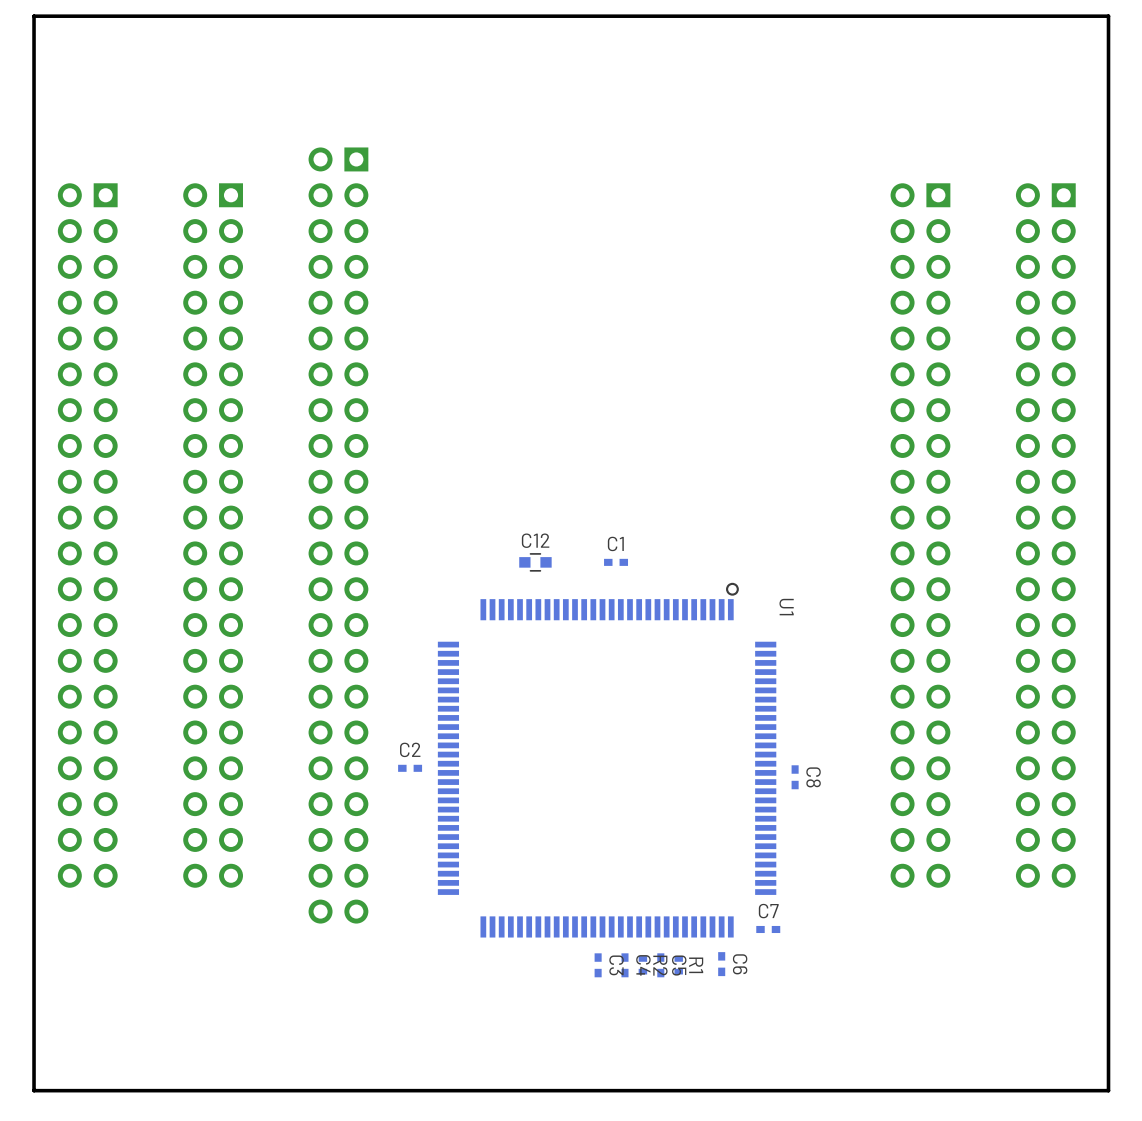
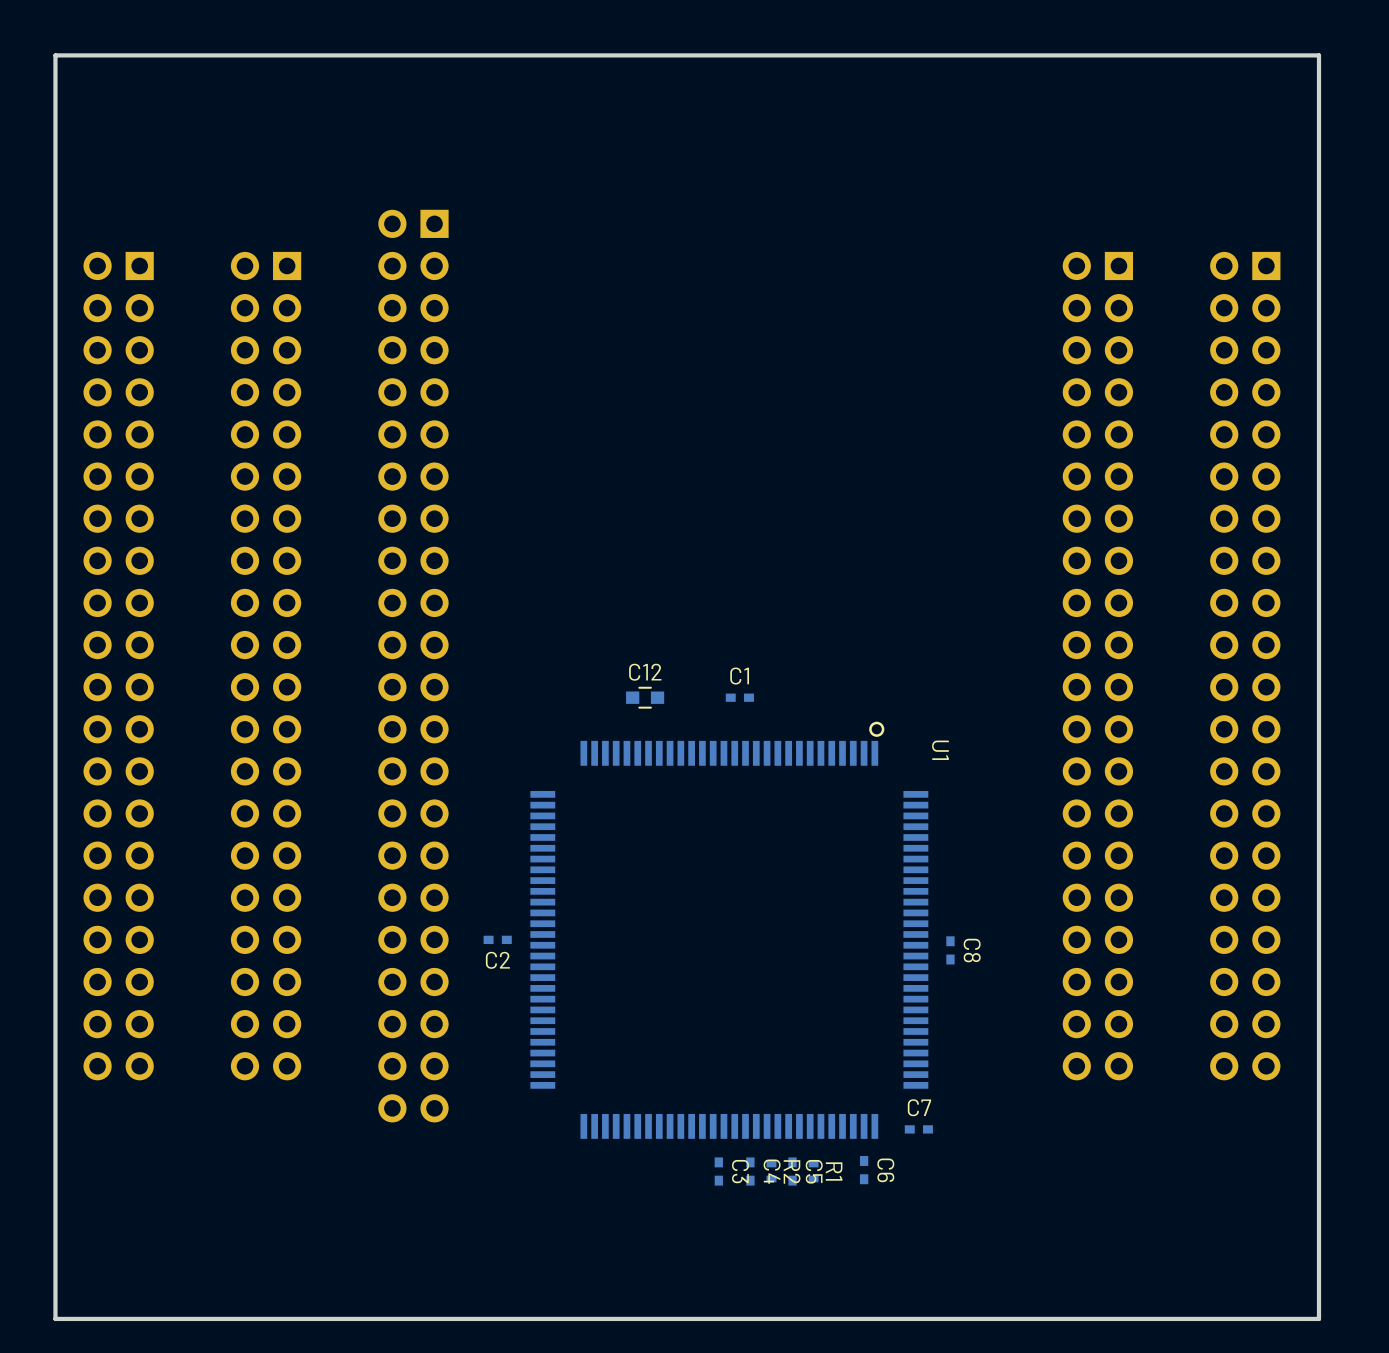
C2 name position: C2 (410, 749) -> C2 (497, 960)

